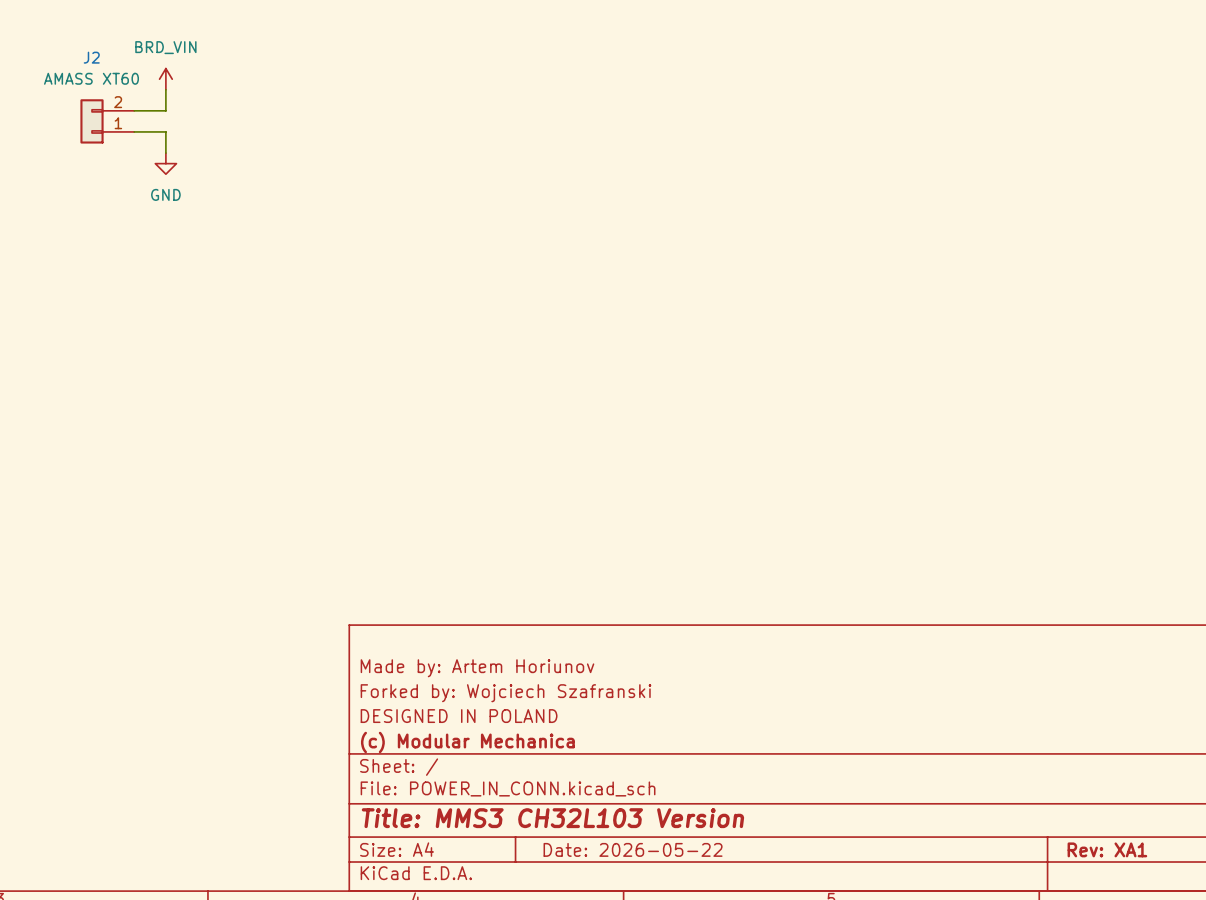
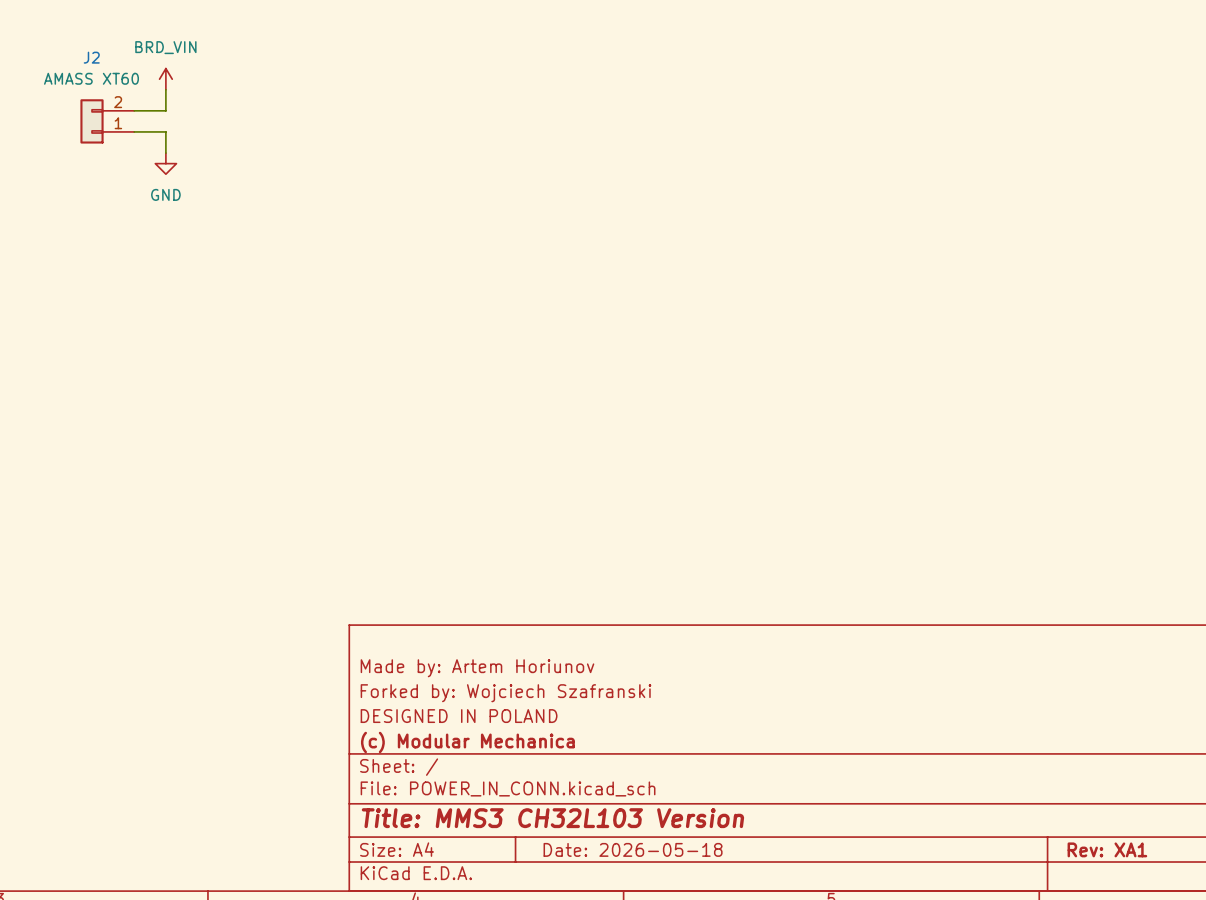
title block: Date: 2026-05-22 (633, 849) -> Date: 2026-05-18 (633, 849)

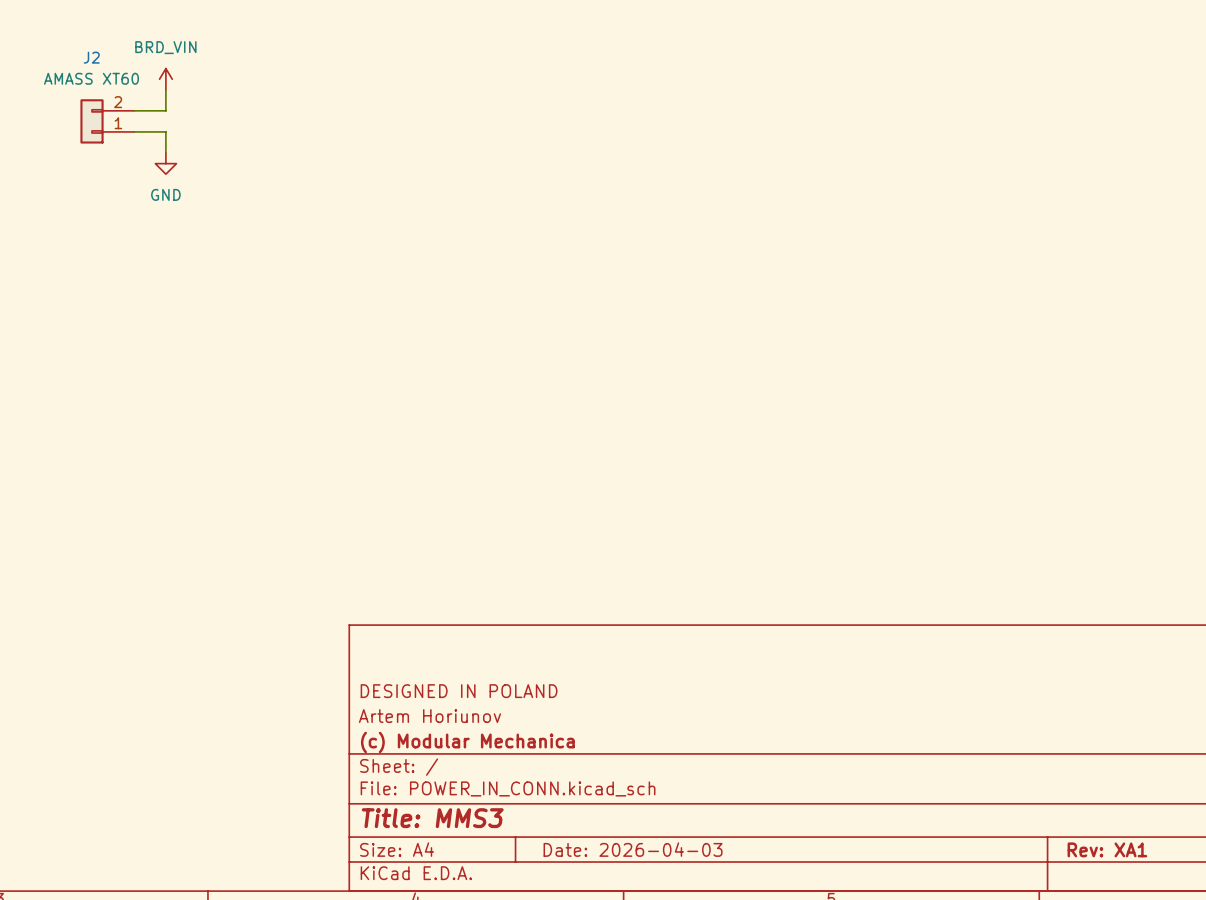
title block: Made by: Artem Horiunov (477, 668) -> none
title block: Forked by: Wojciech Szafranski (505, 693) -> DESIGNED IN POLAND (459, 691)
title block: DESIGNED IN POLAND (459, 716) -> Artem Horiunov (429, 716)
title block: Title: MMS3 CH32L103 Version (552, 818) -> Title: MMS3 (432, 818)
title block: Date: 2026-05-18 (633, 849) -> Date: 2026-04-03 (633, 849)

